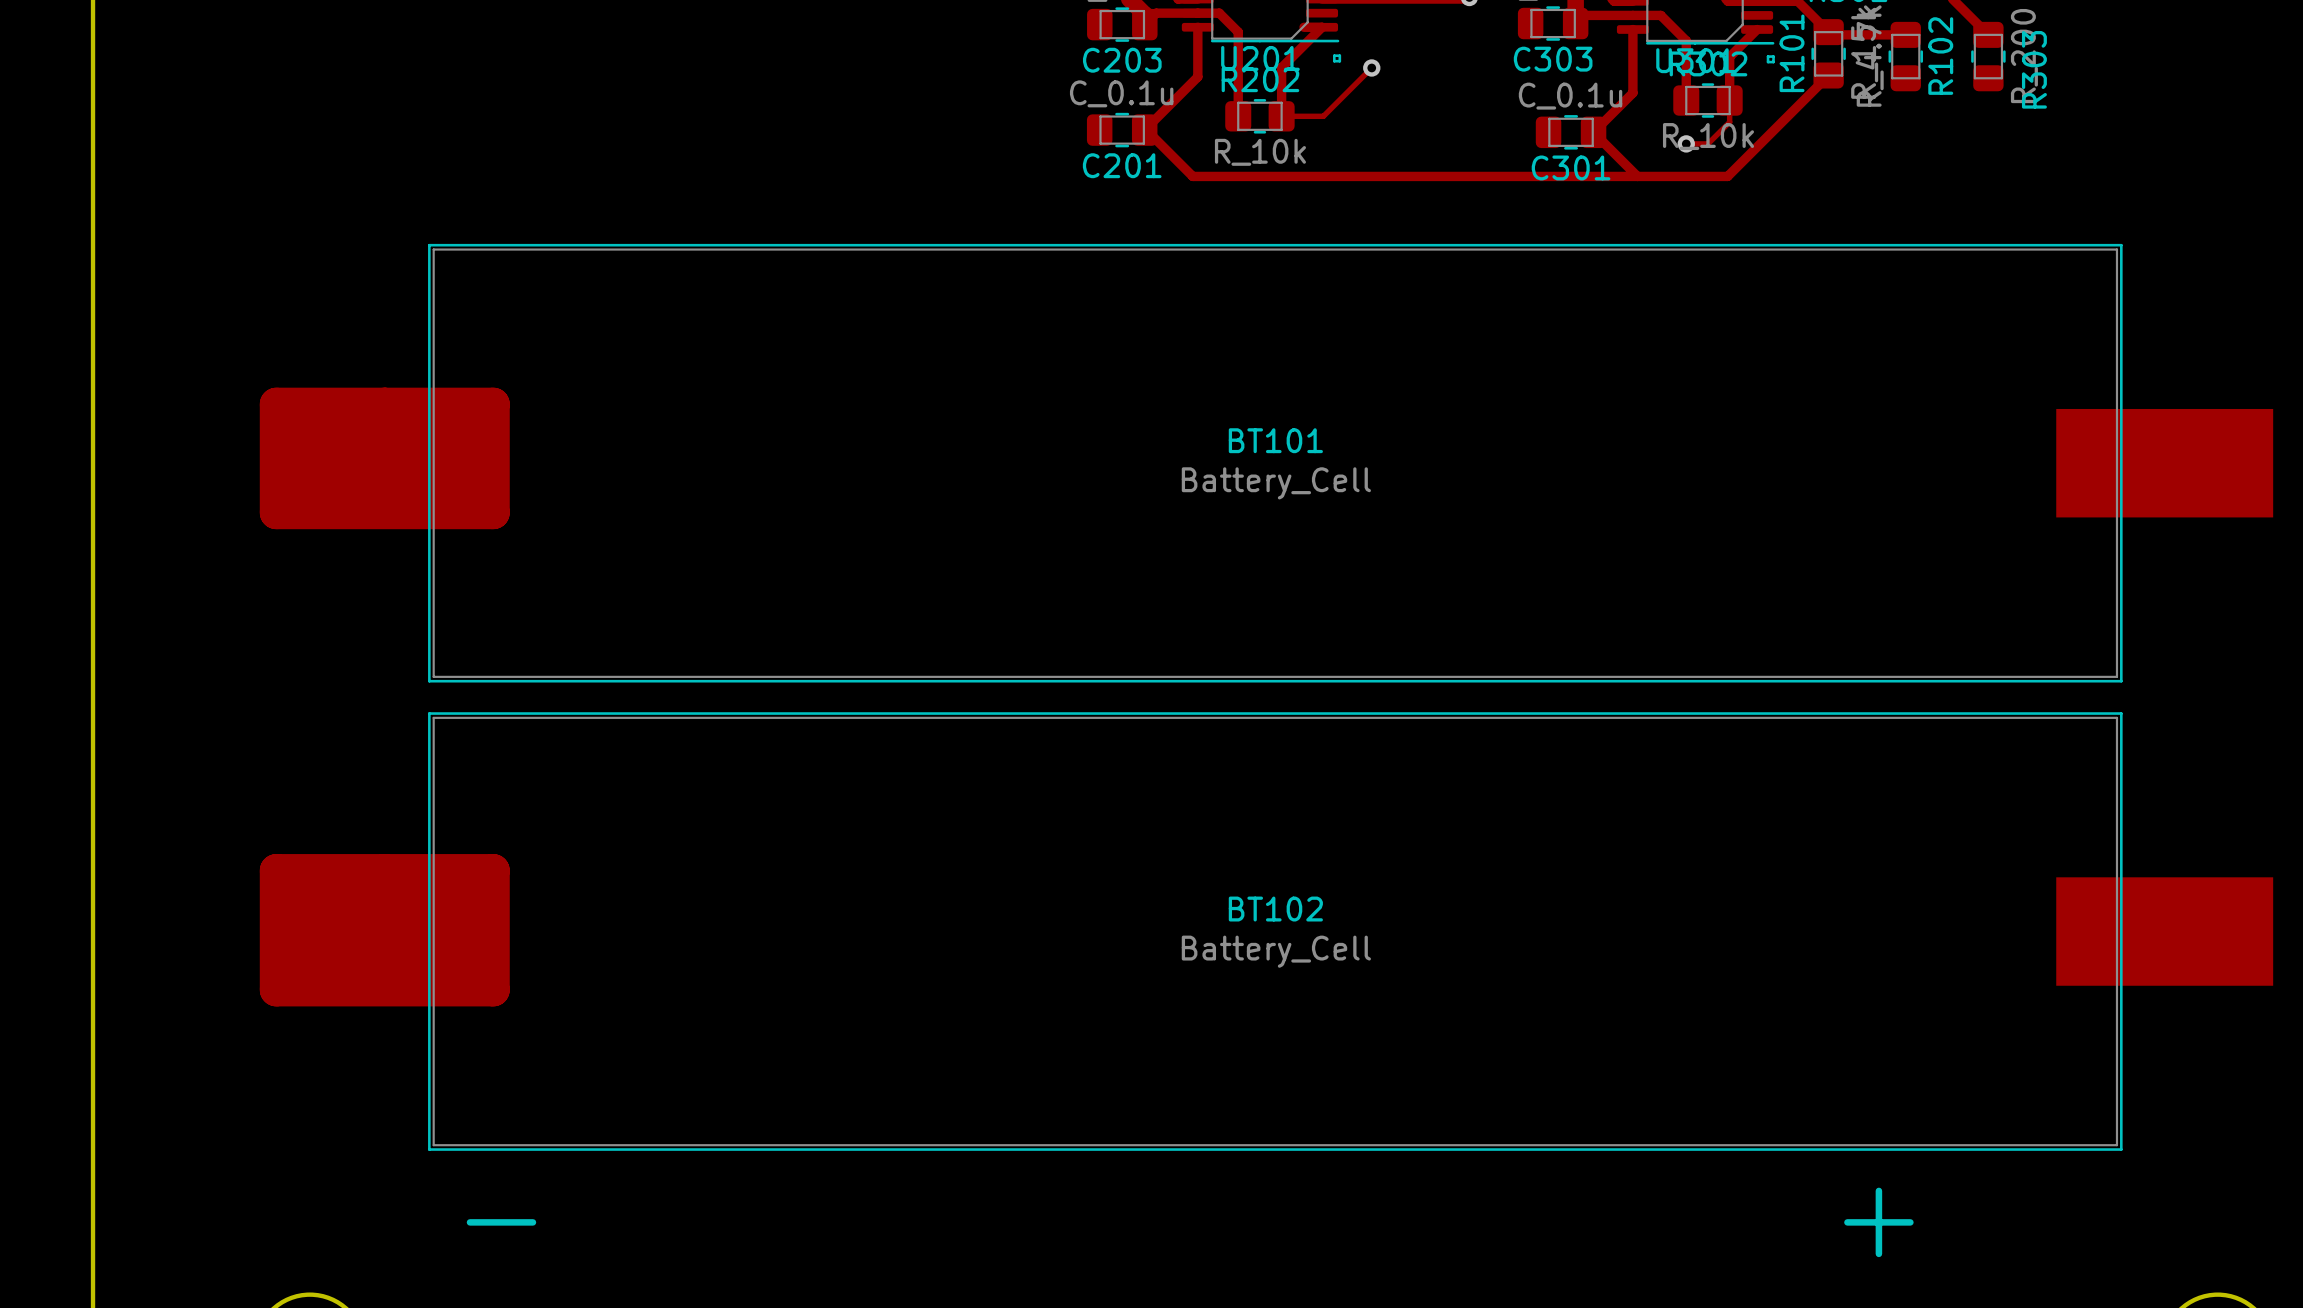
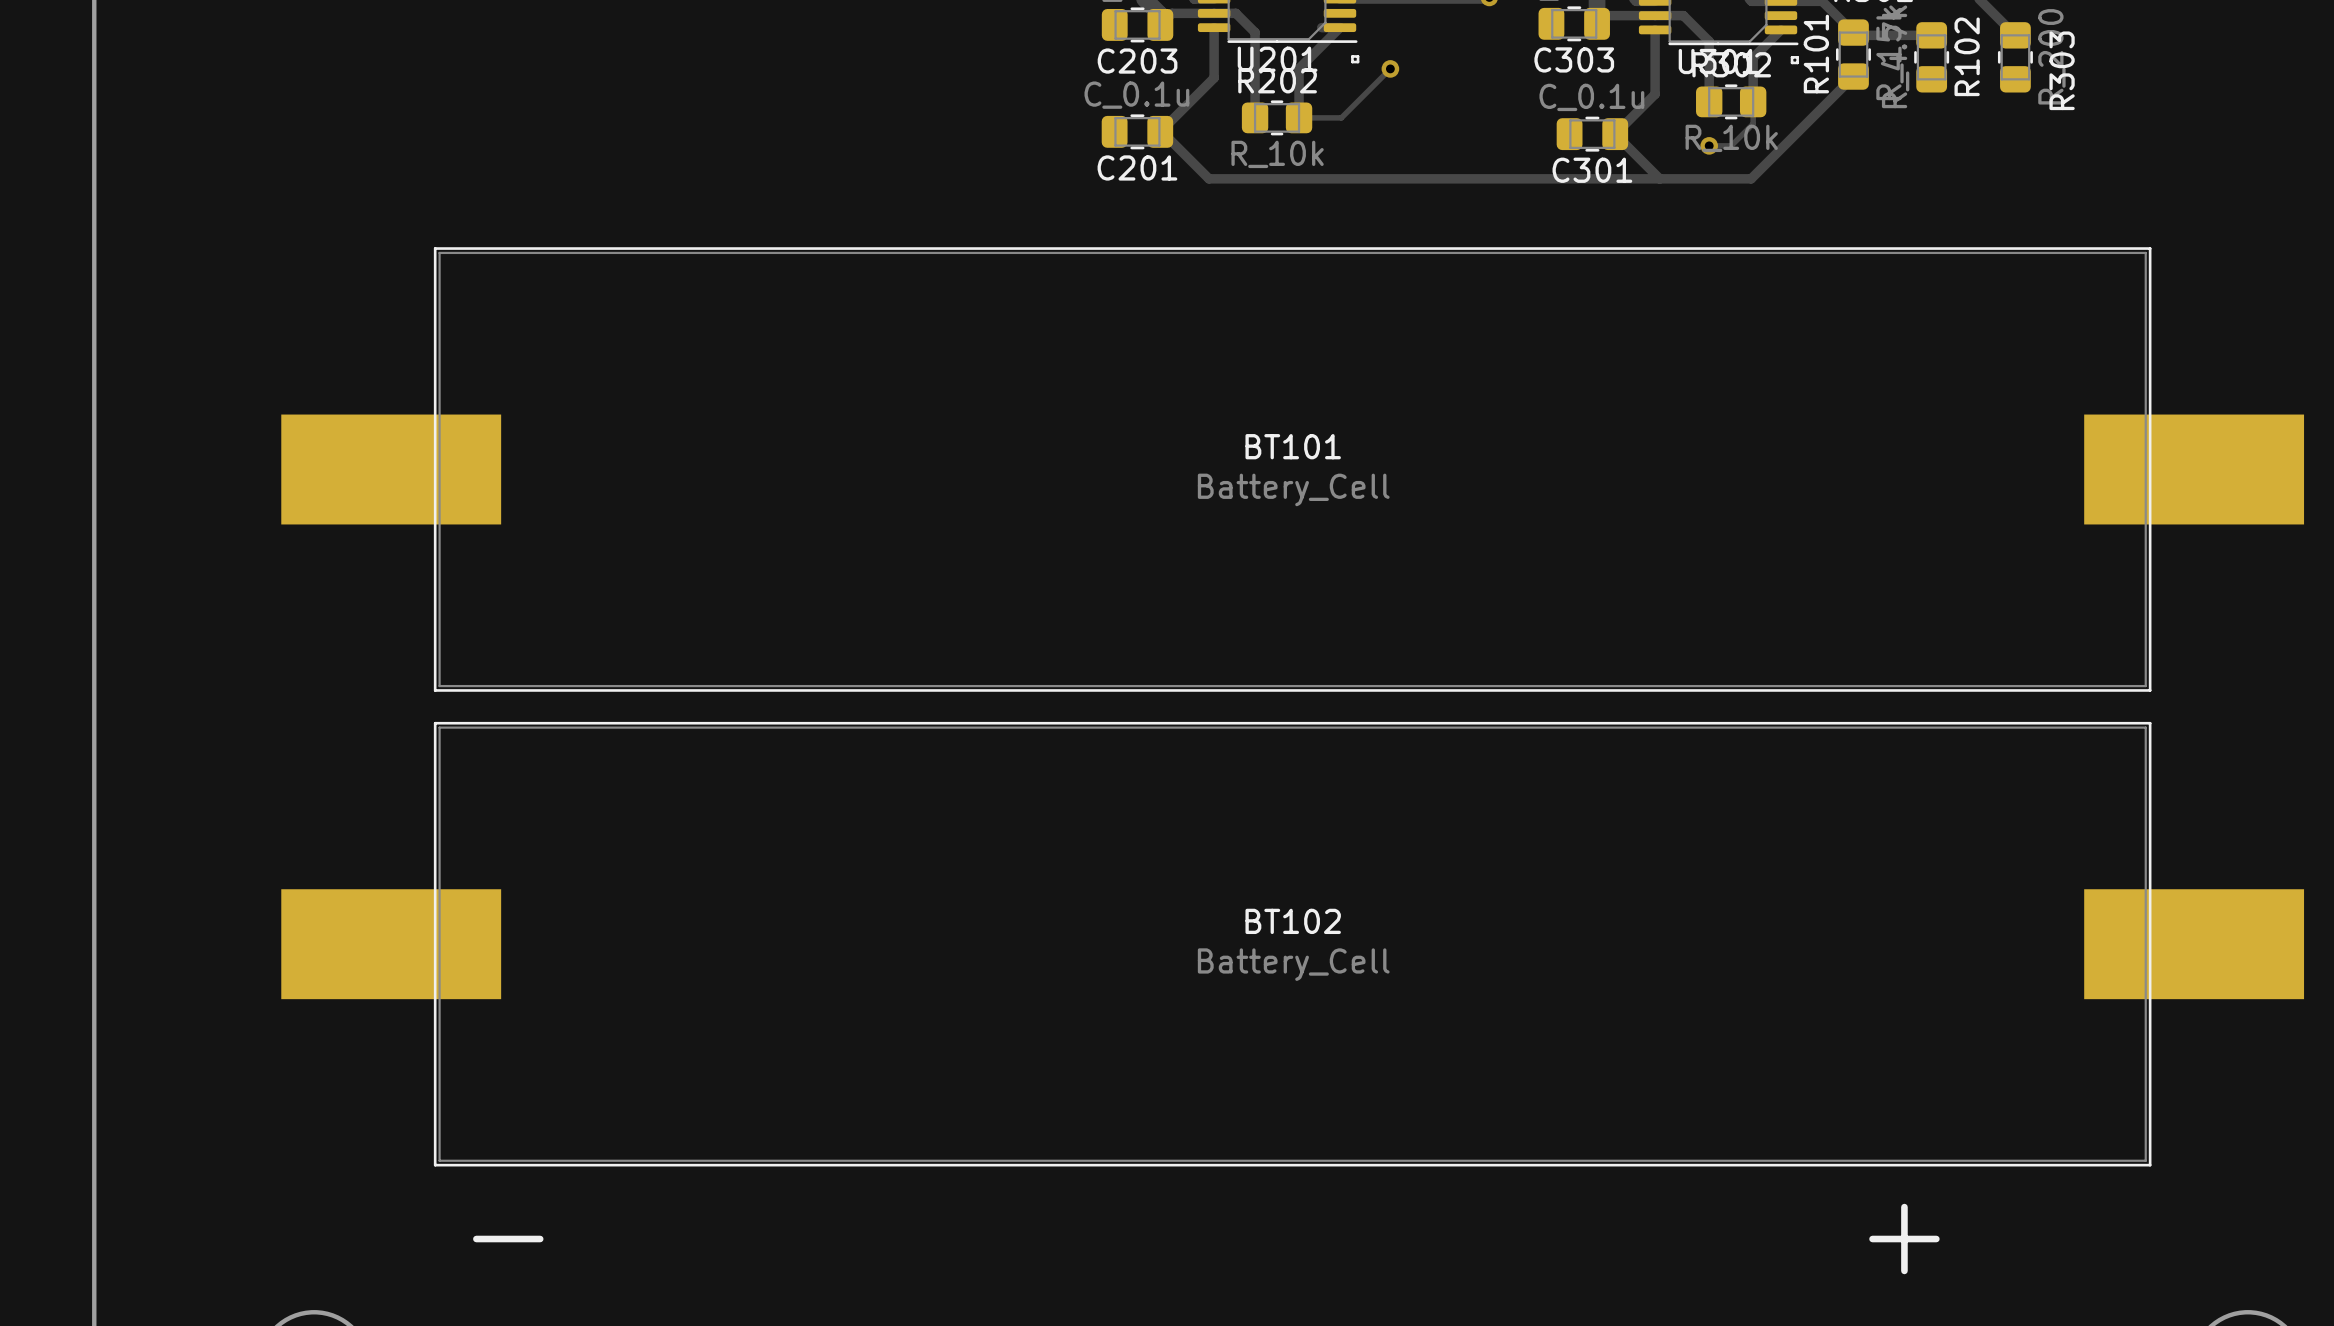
track: (276, 404) (493, 404) (493, 512) (276, 512) (276, 404) -> none
track: (276, 870) (276, 989) (493, 989) (493, 870) (276, 870) -> none

